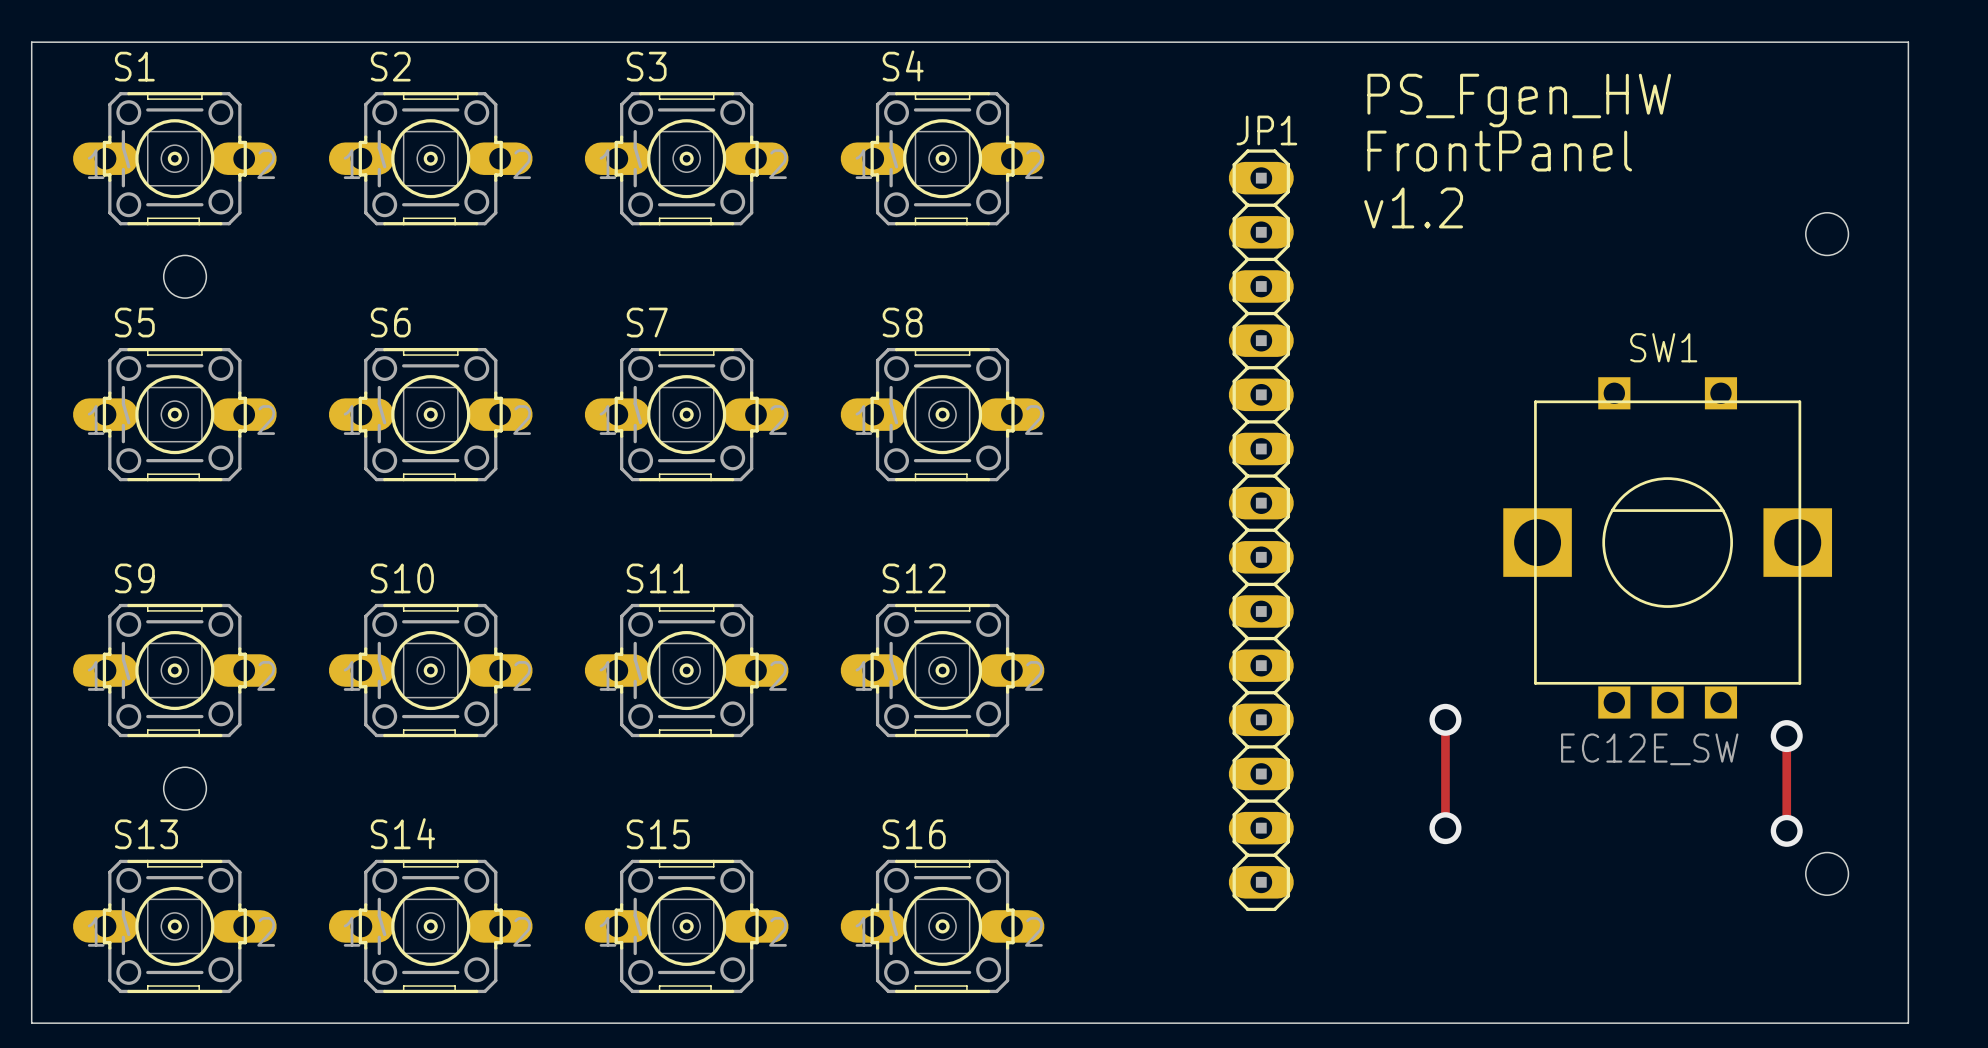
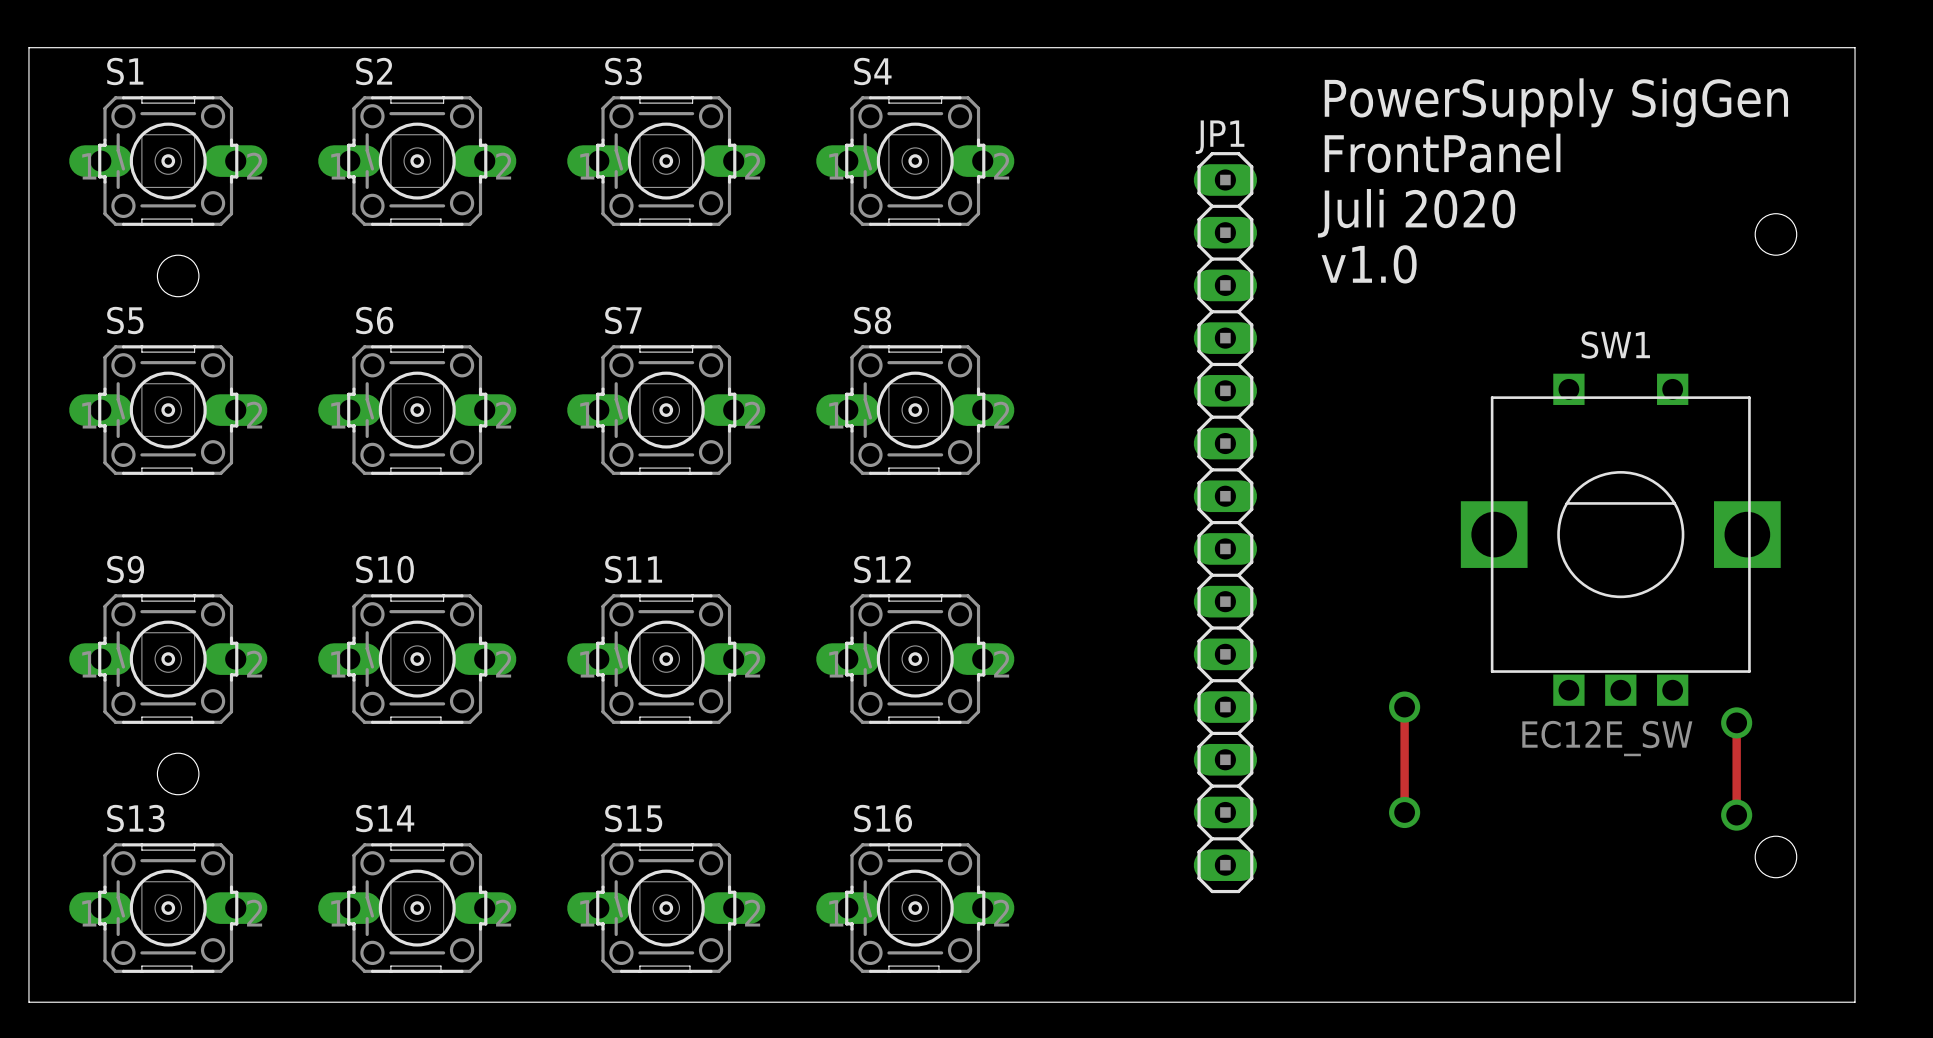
text: PS_Fgen_HW (1519, 100) -> PowerSupply SigGen (1556, 102)
text: v1.2 (1413, 207) -> Juli 2020 (1416, 213)
text: none -> v1.0 (1369, 264)

